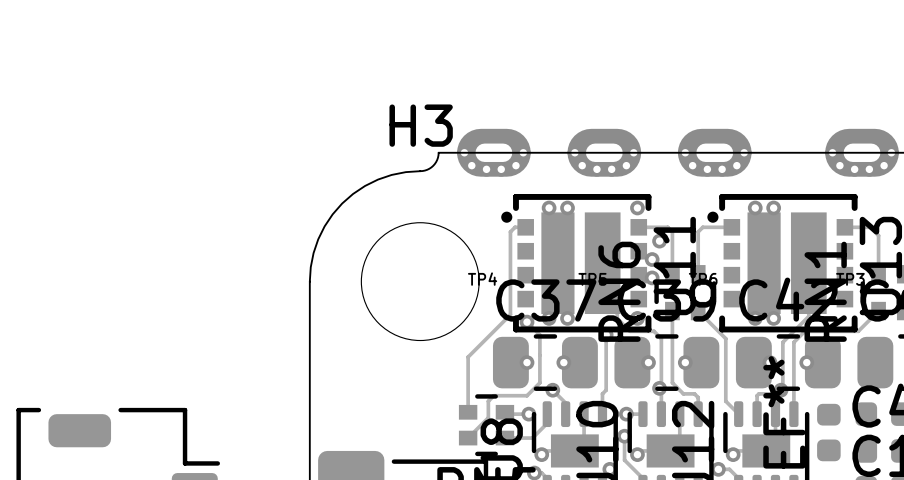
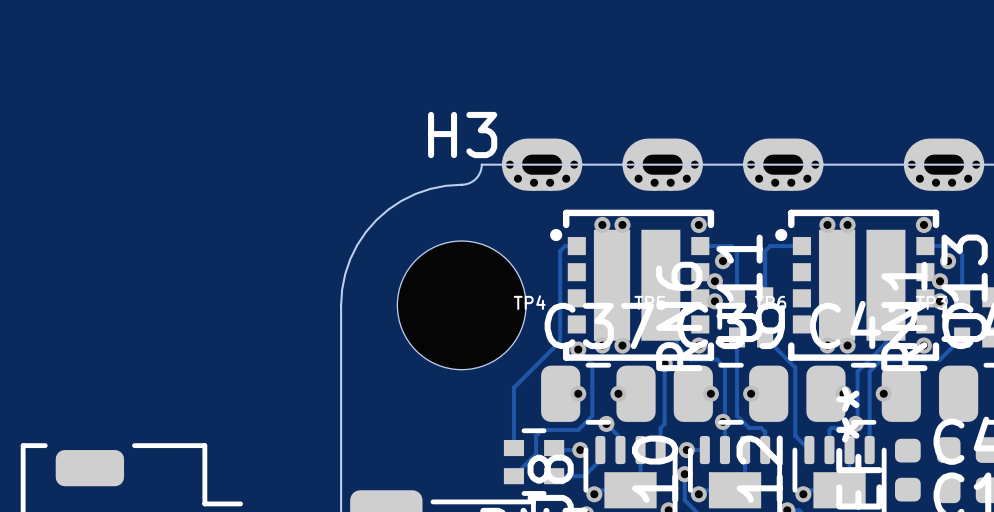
via: none -> (923, 224)
via: none -> (948, 261)
via: none -> (940, 281)
via: none -> (940, 301)
via: none -> (923, 345)

